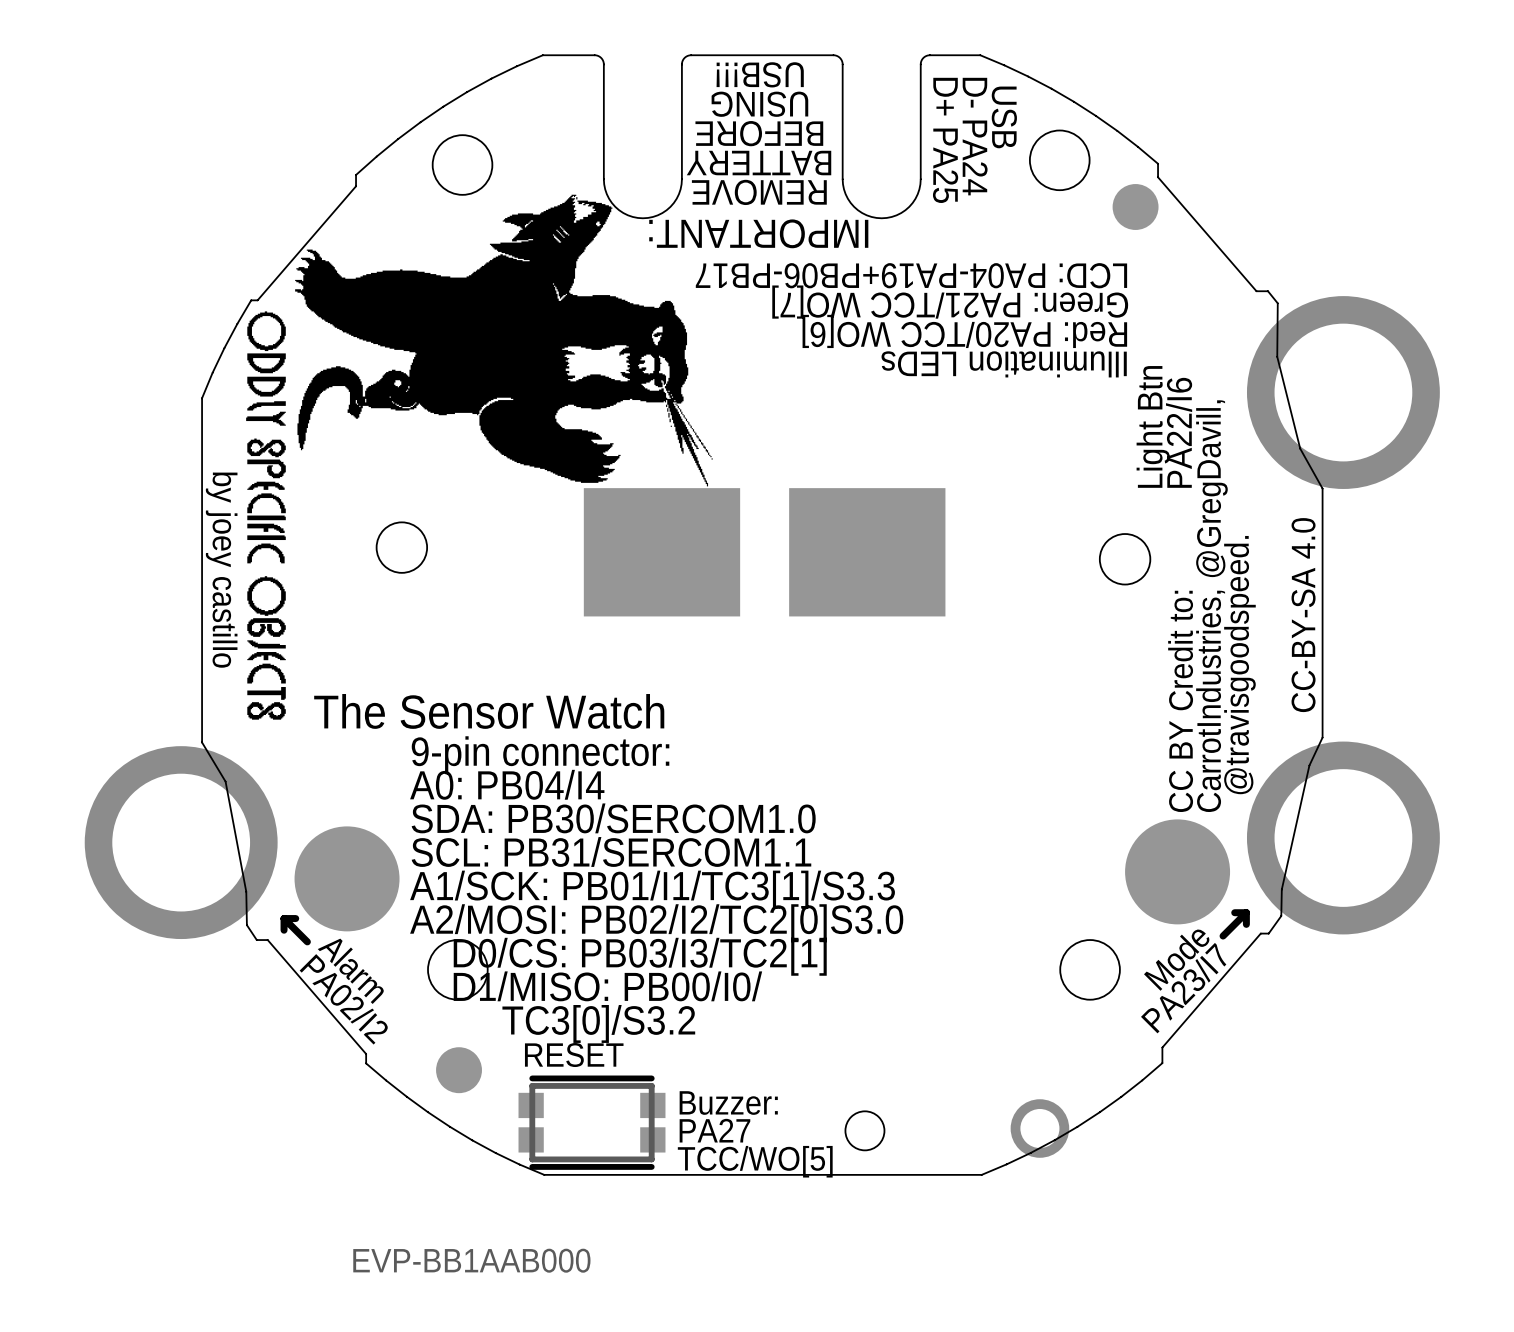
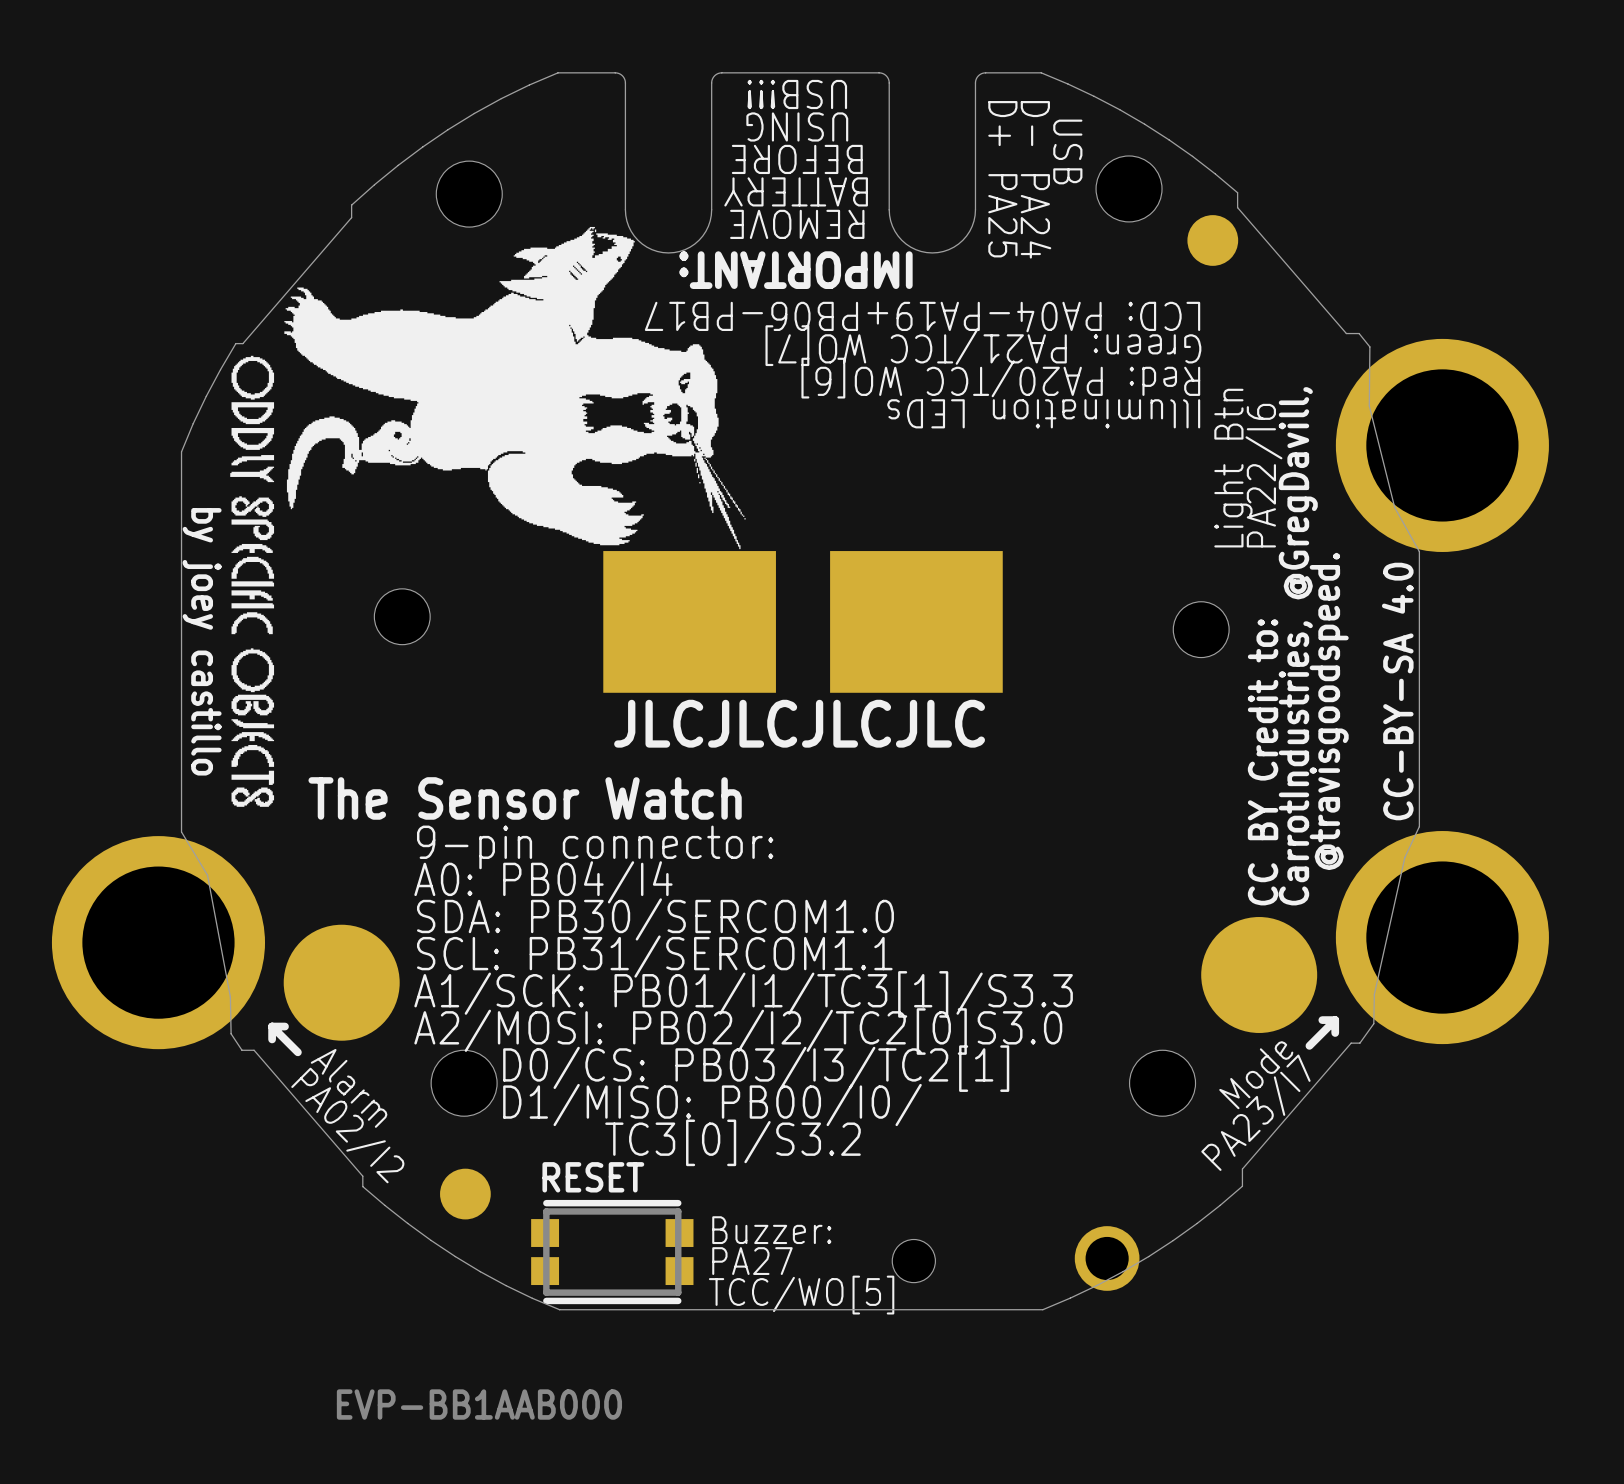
text: none -> JLCJLCJLCJLC (799, 723)

